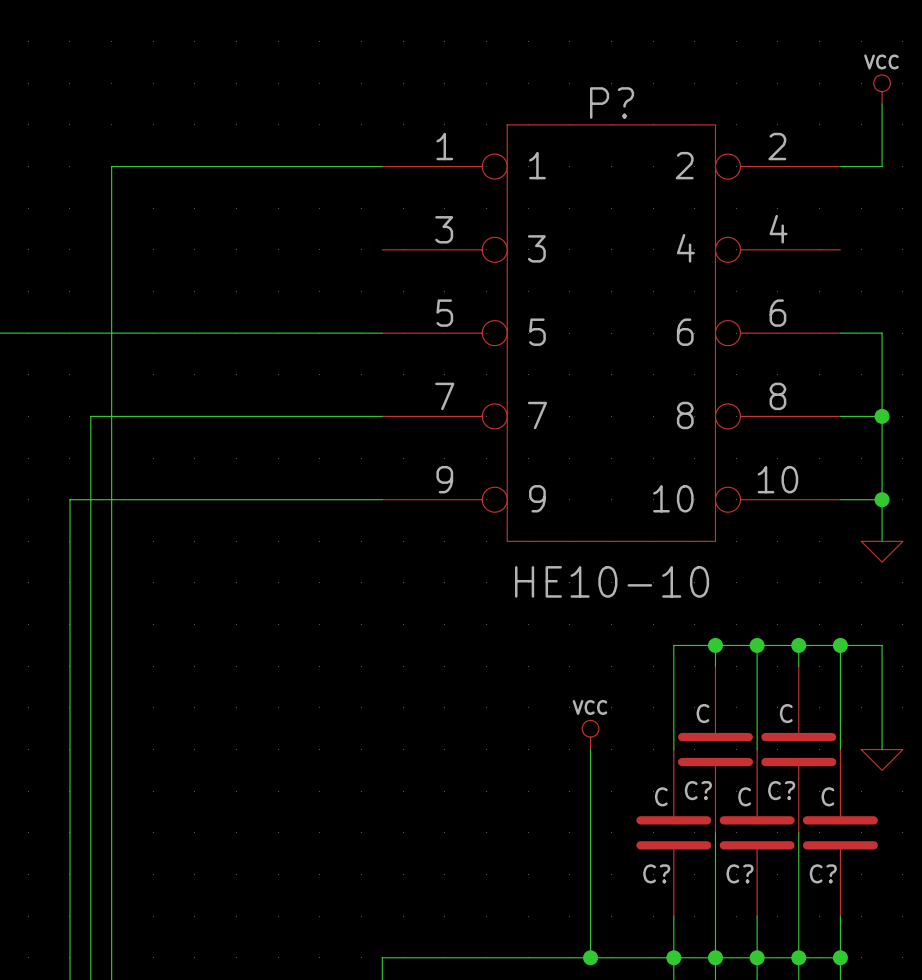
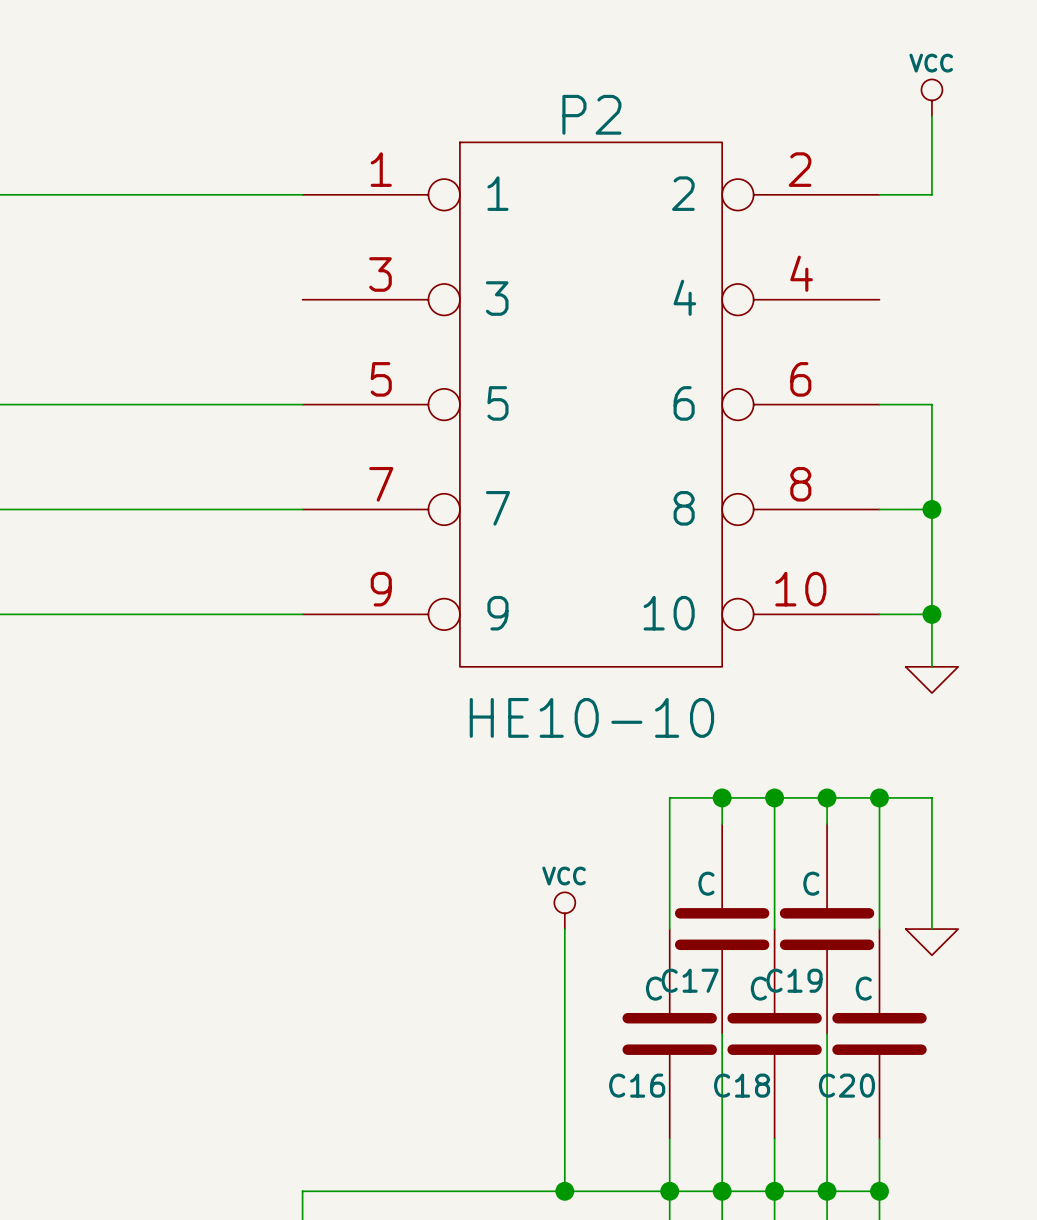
P? name: P? (612, 102) -> P2 (591, 114)
C? name: C? (698, 790) -> C17 (690, 980)
C? name: C? (781, 790) -> C19 (794, 980)
C? name: C? (656, 873) -> C16 (637, 1085)
C? name: C? (740, 873) -> C18 (742, 1085)
C? name: C? (823, 873) -> C20 (846, 1085)

